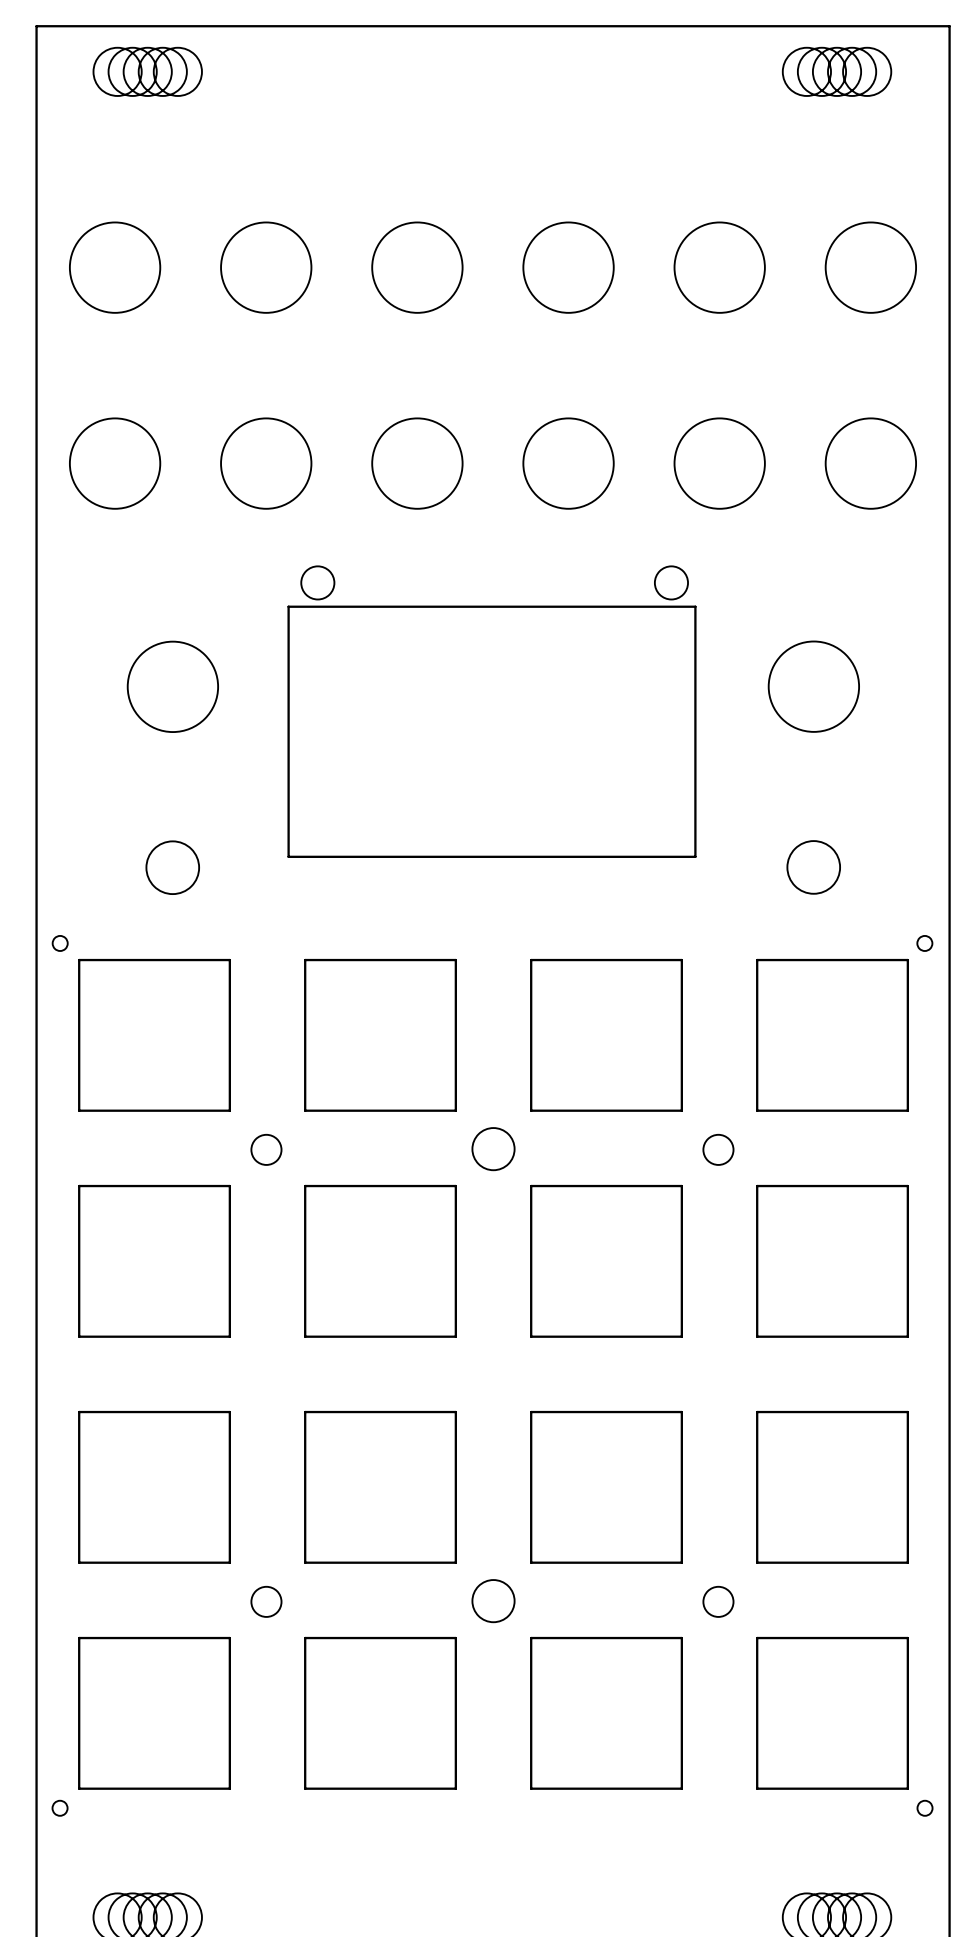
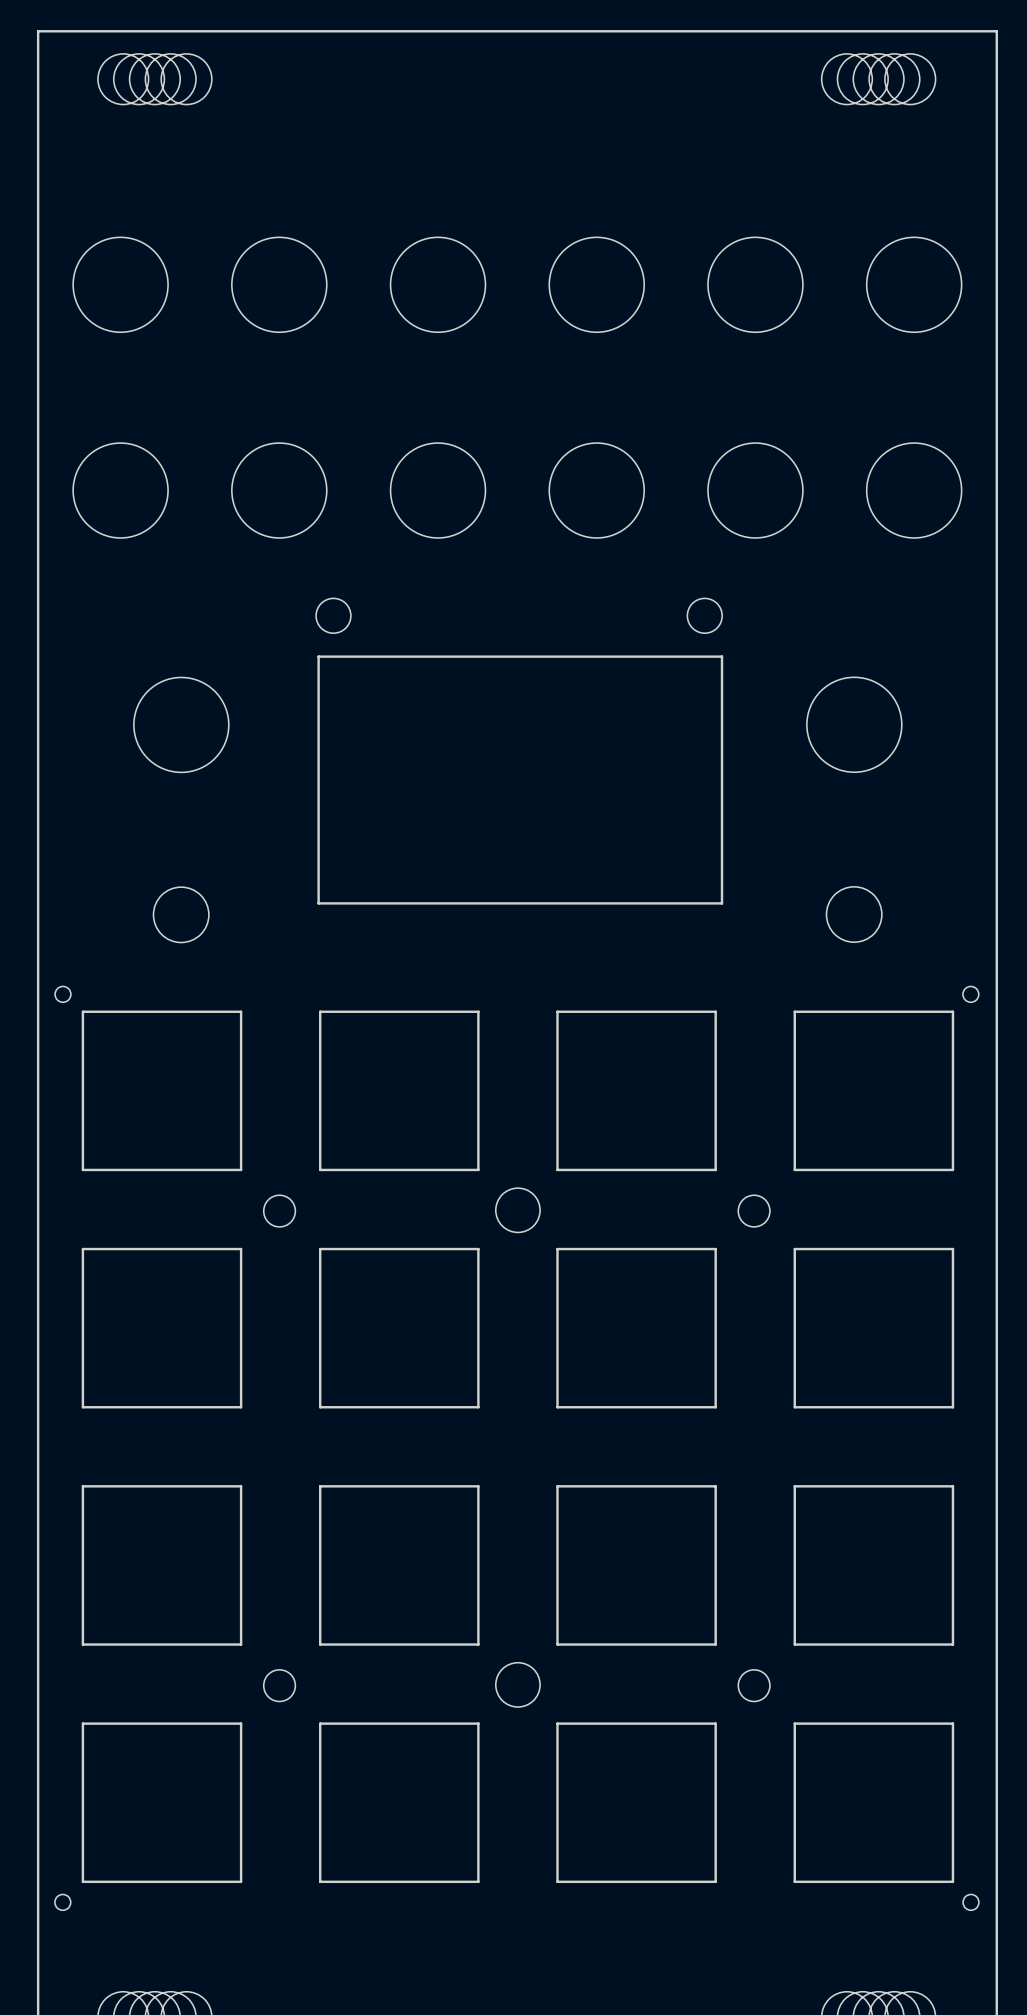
board edge: (687, 856) (695, 856) (695, 606) (288, 606) (288, 856) (303, 856) -> (722, 903) (722, 656) (318, 656) (318, 903)

